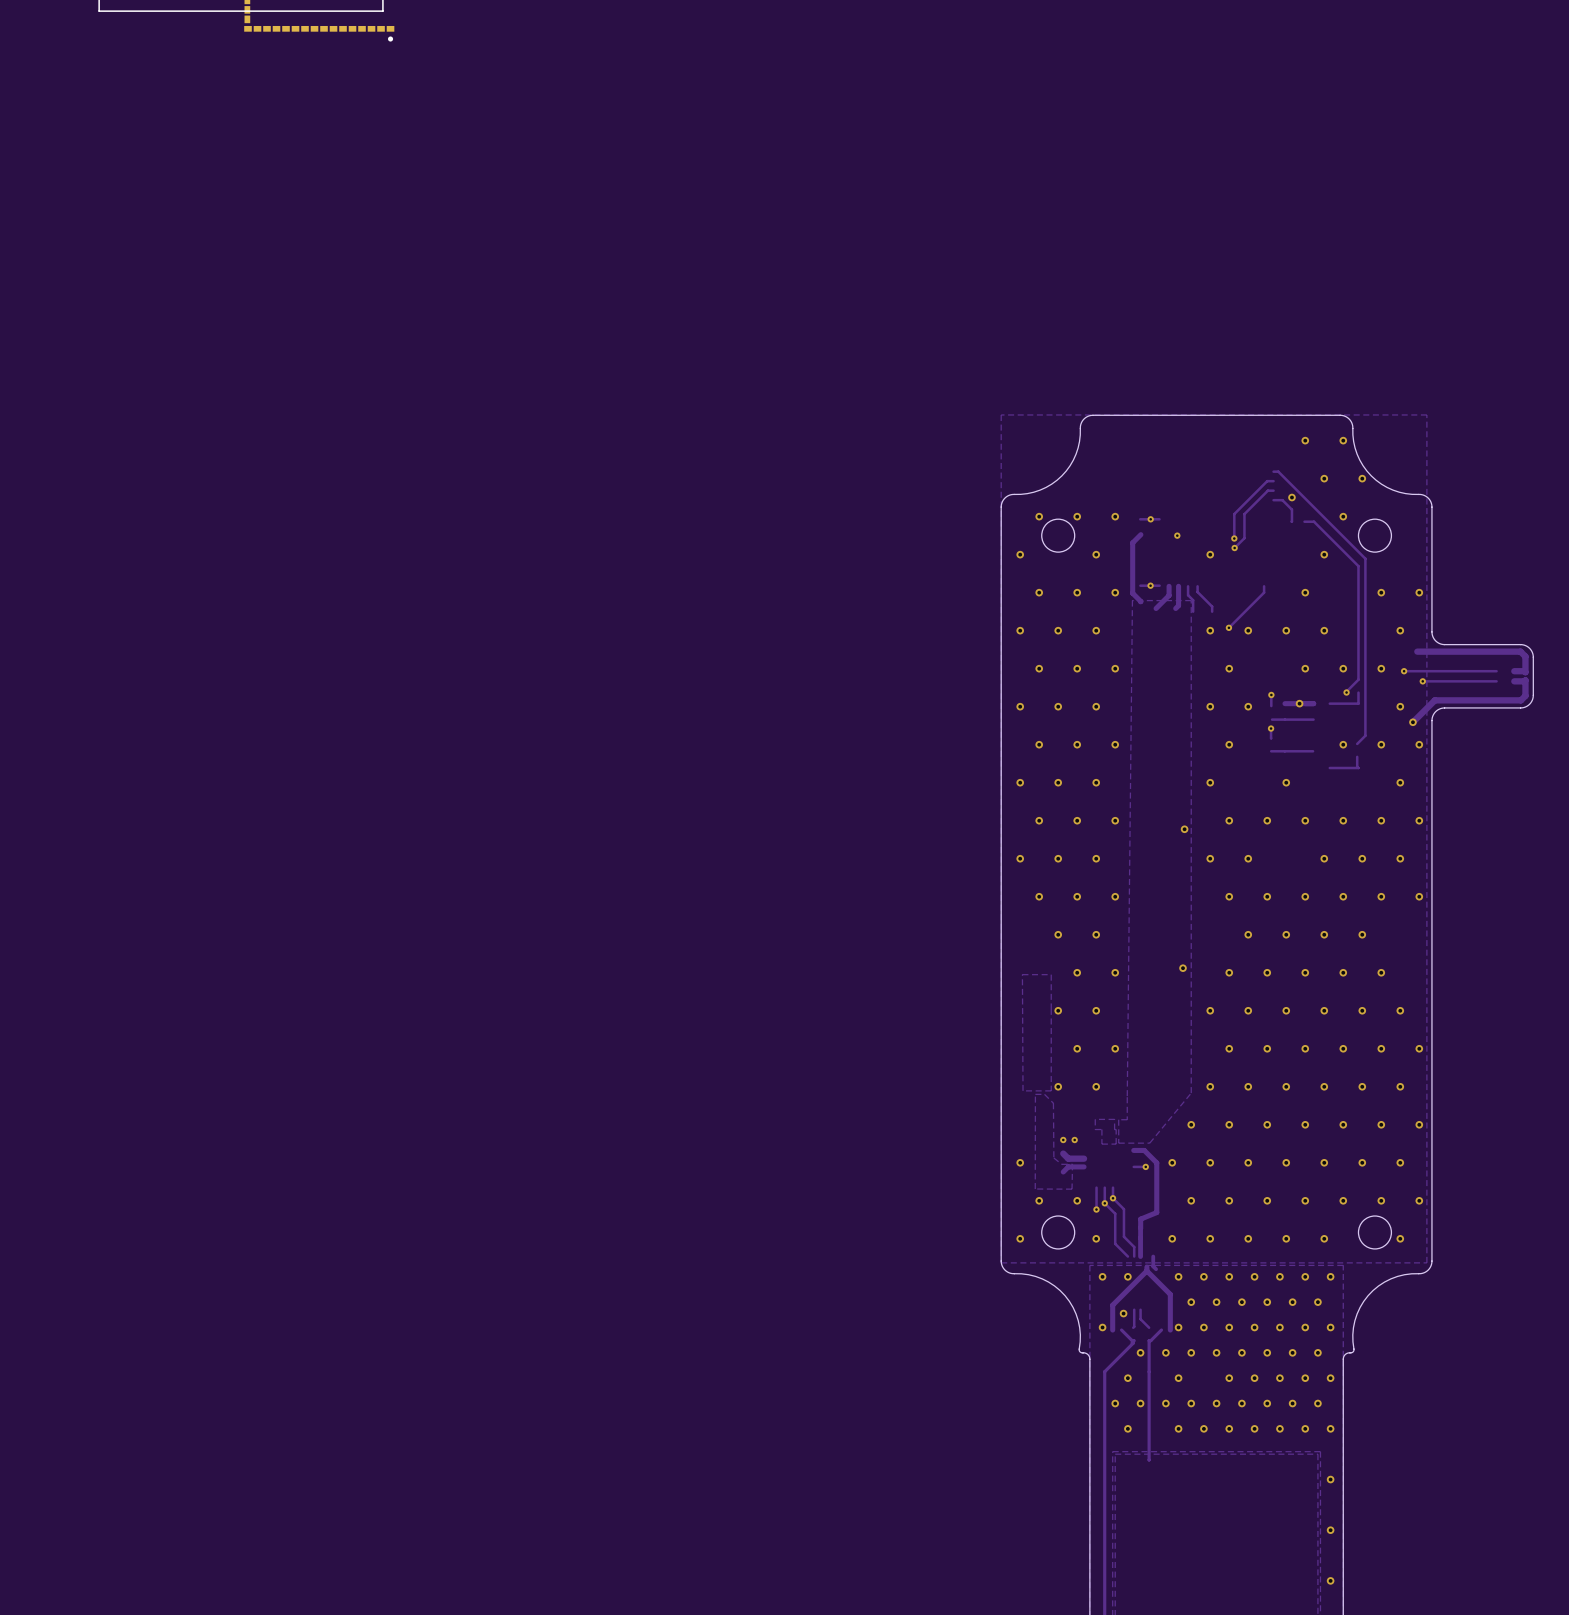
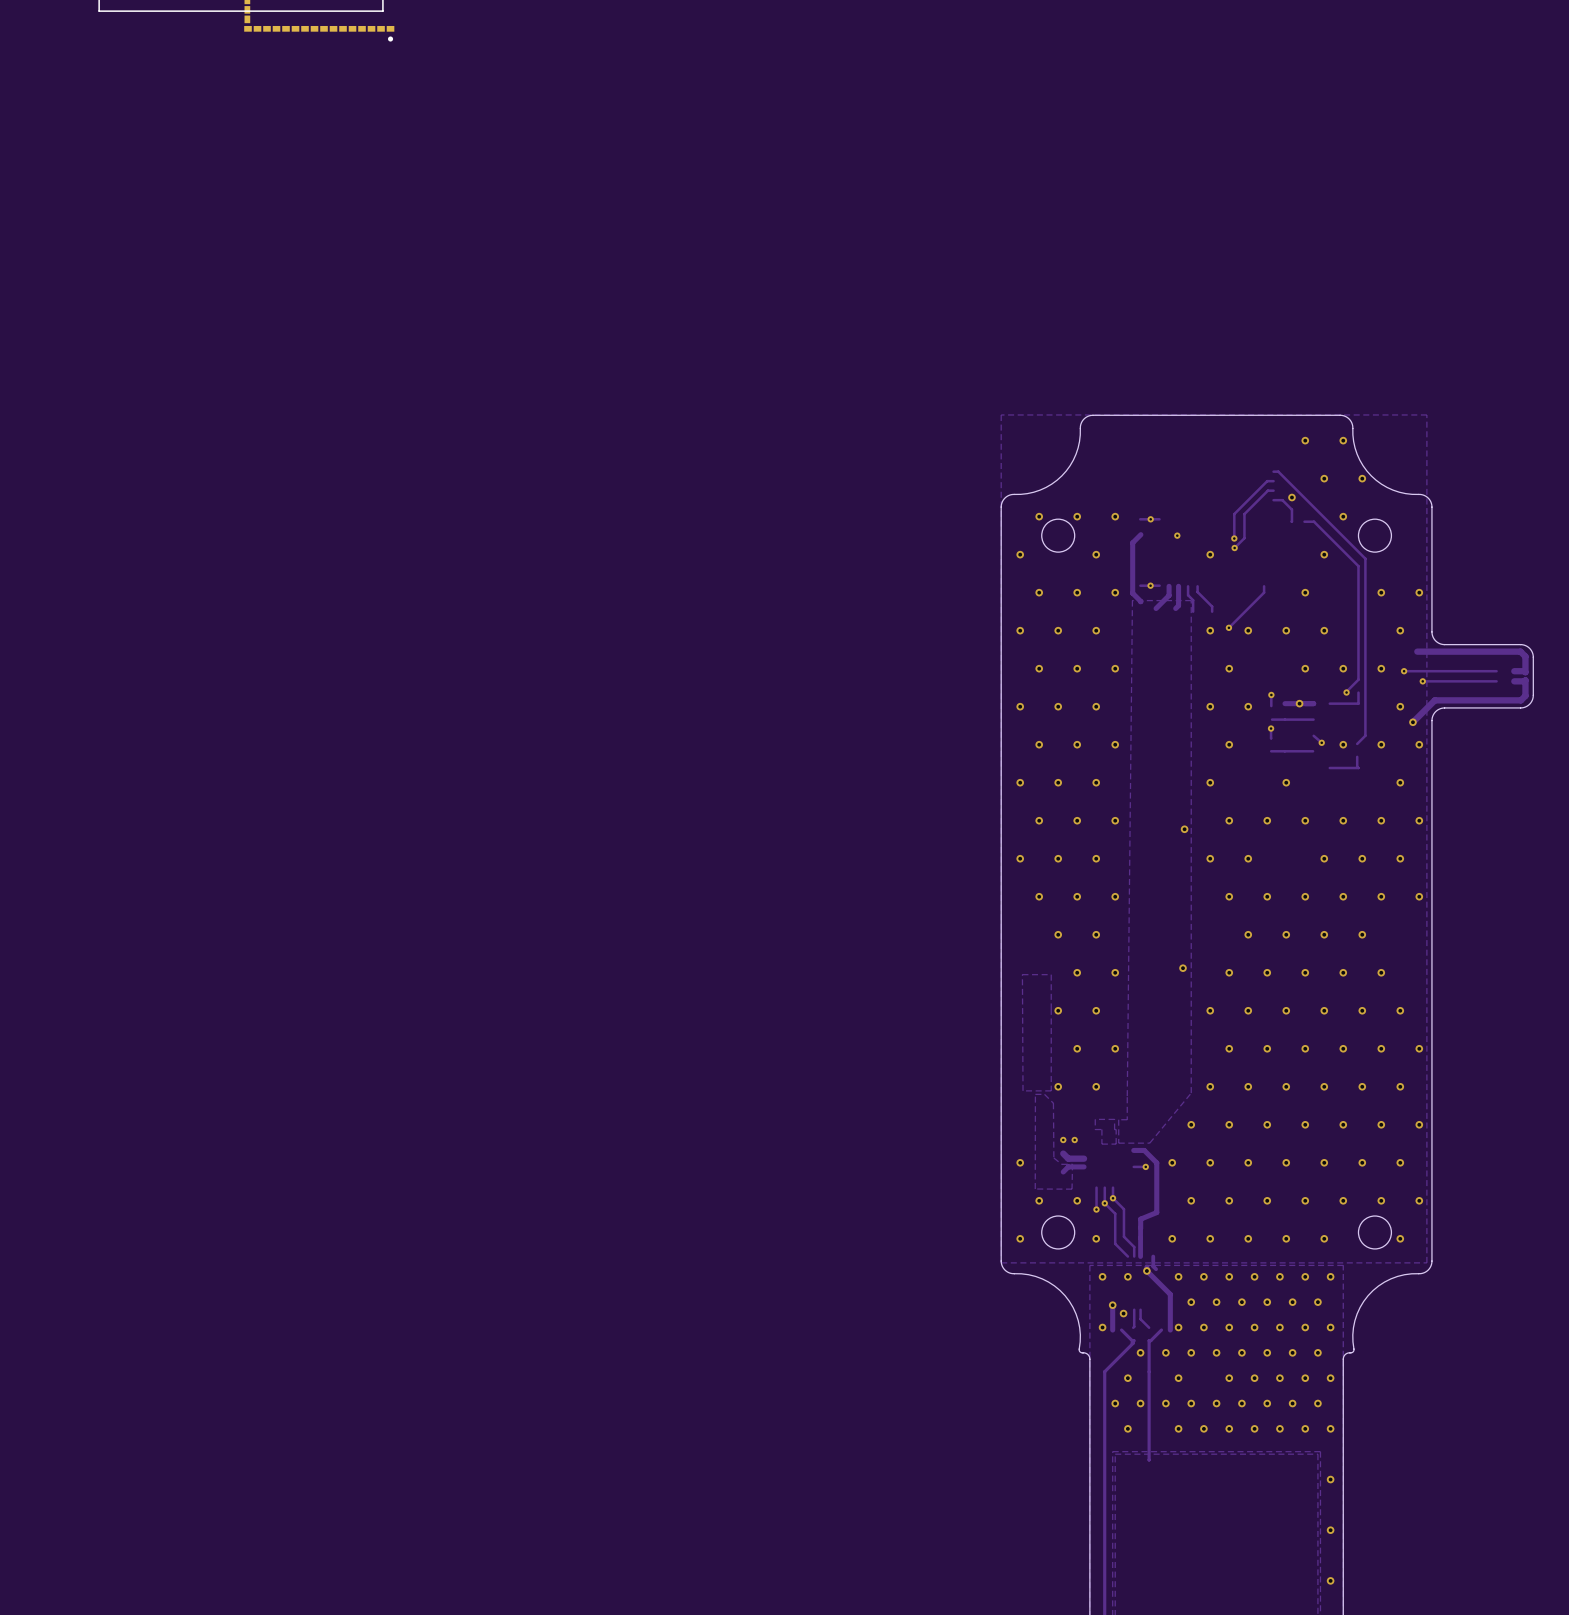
track: none -> (1313, 735) (1321, 742)
via: none -> (1321, 742)
track: (1146, 1270) (1112, 1305) -> none
via: none -> (1146, 1270)
via: none -> (1112, 1305)

